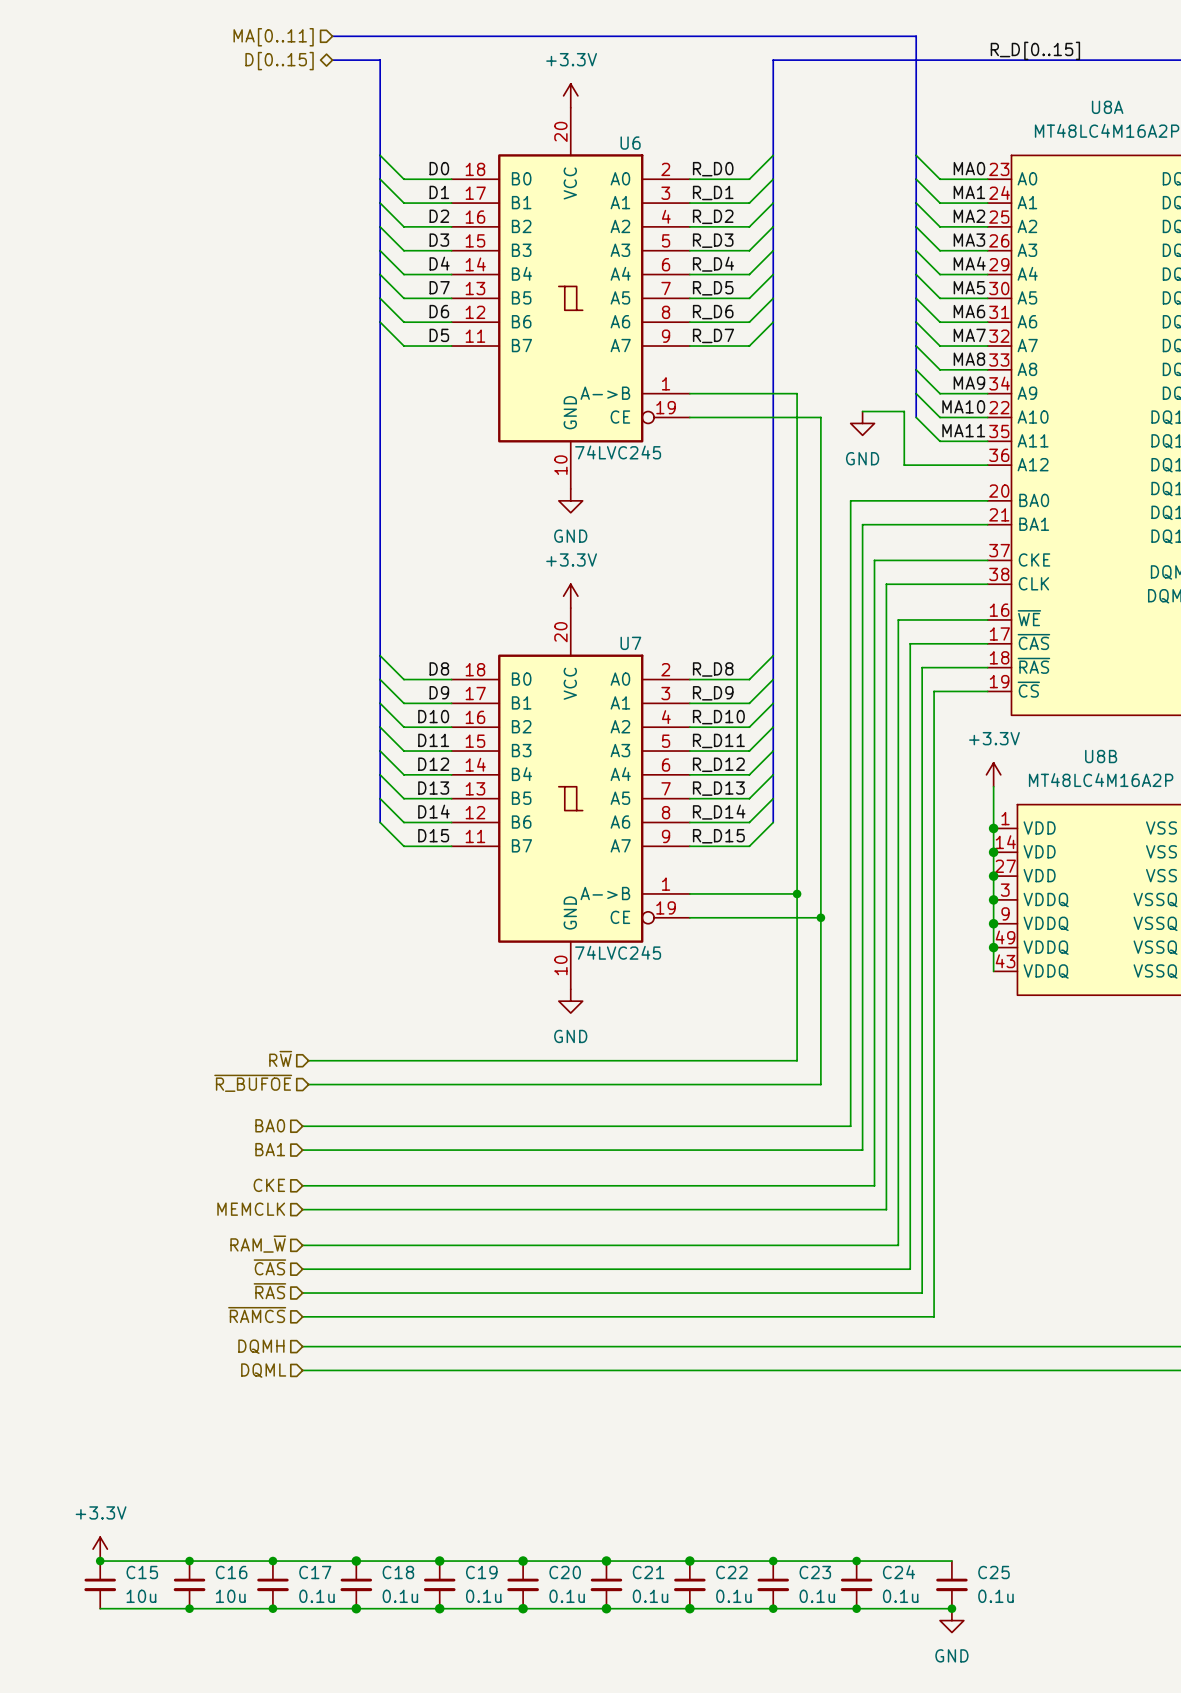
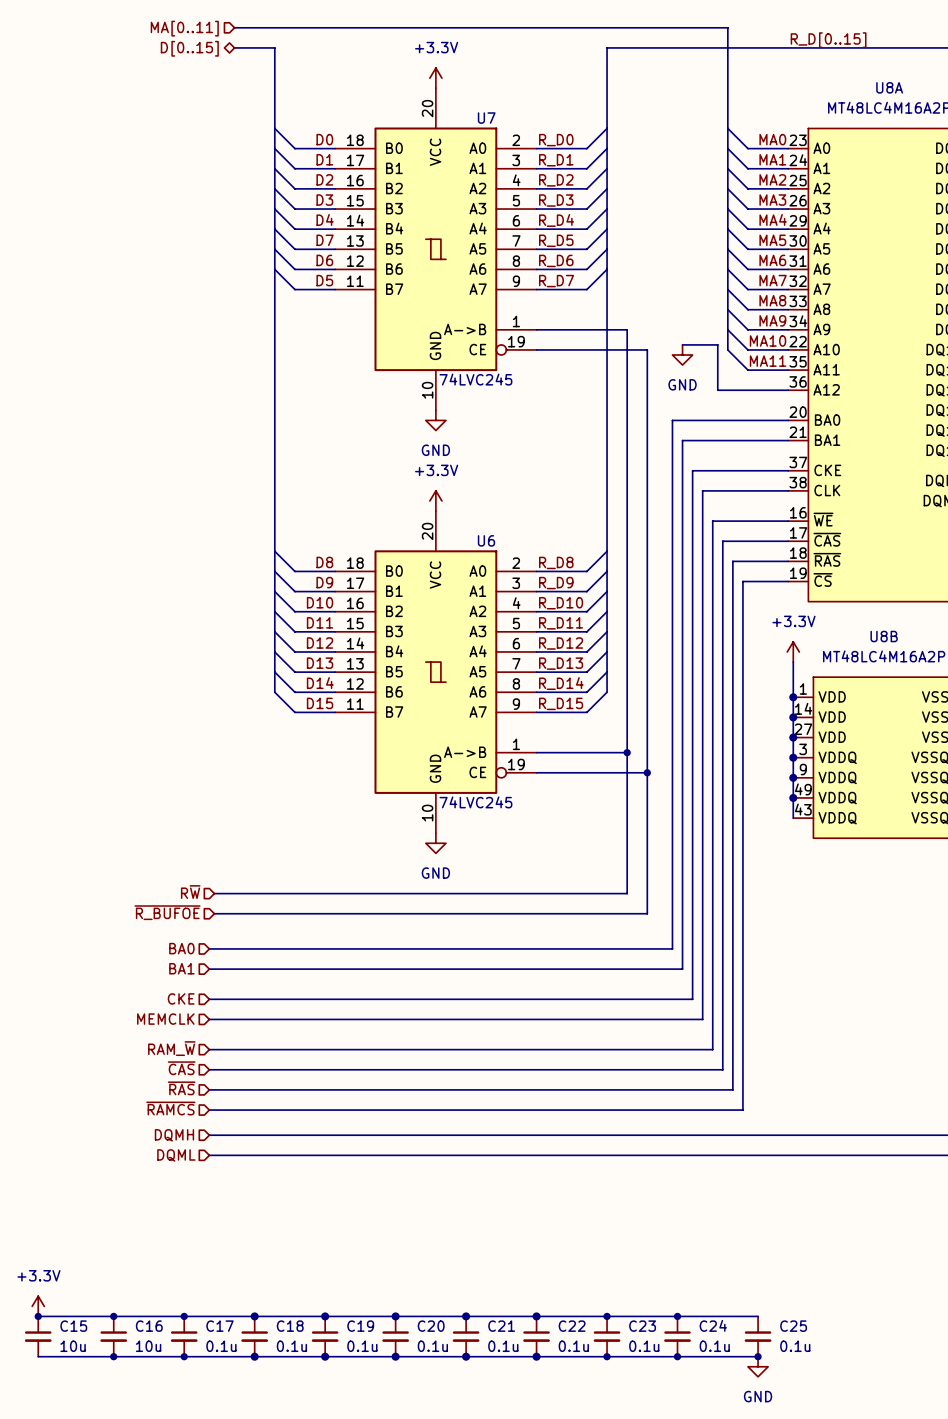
U6 name: U6 (630, 143) -> U7 (486, 118)
U7 name: U7 (630, 643) -> U6 (486, 540)

